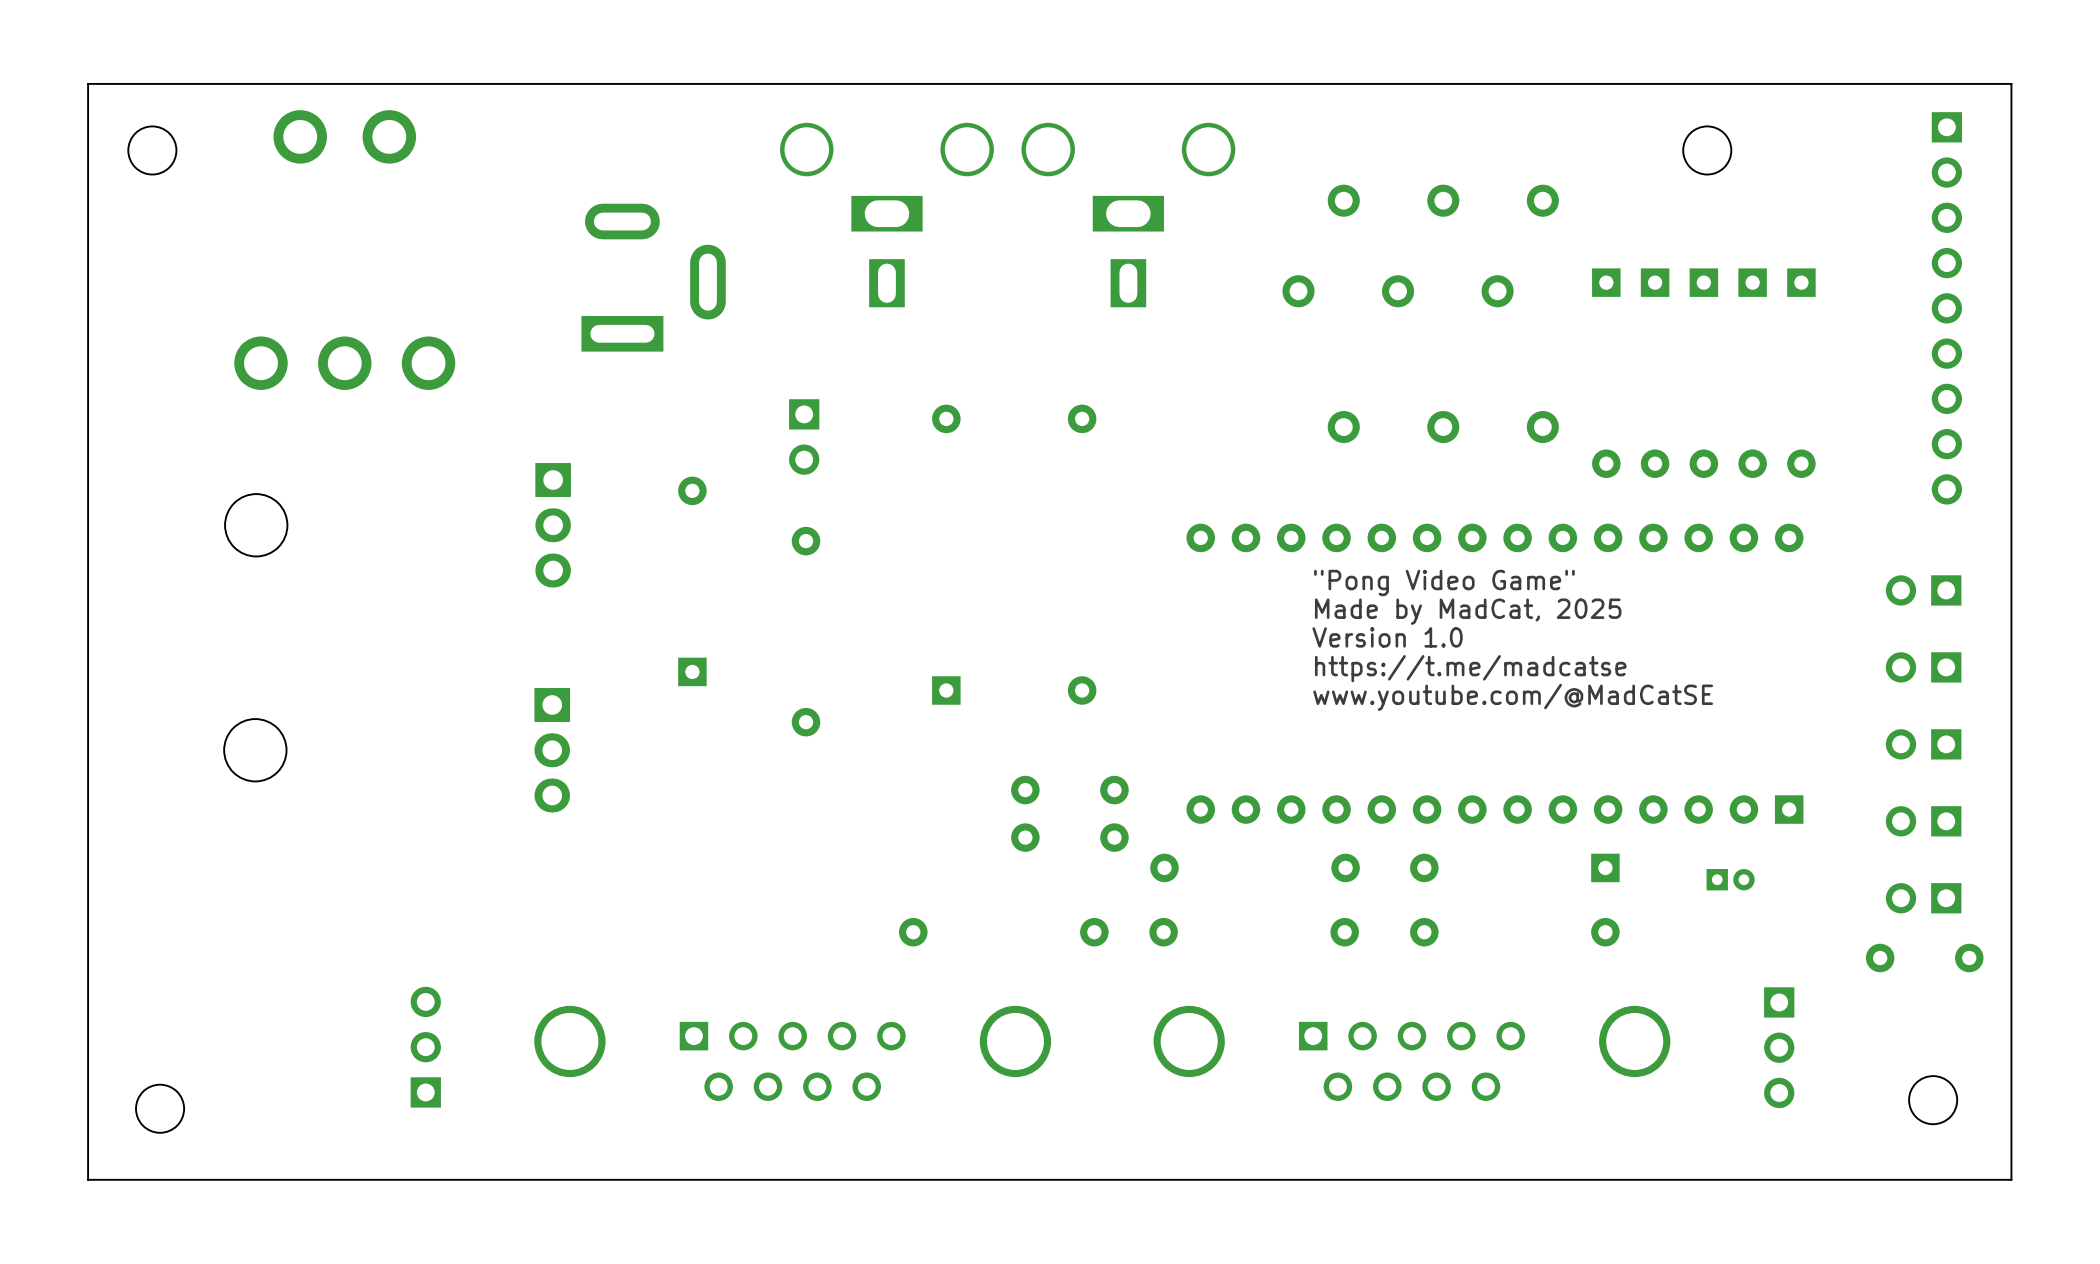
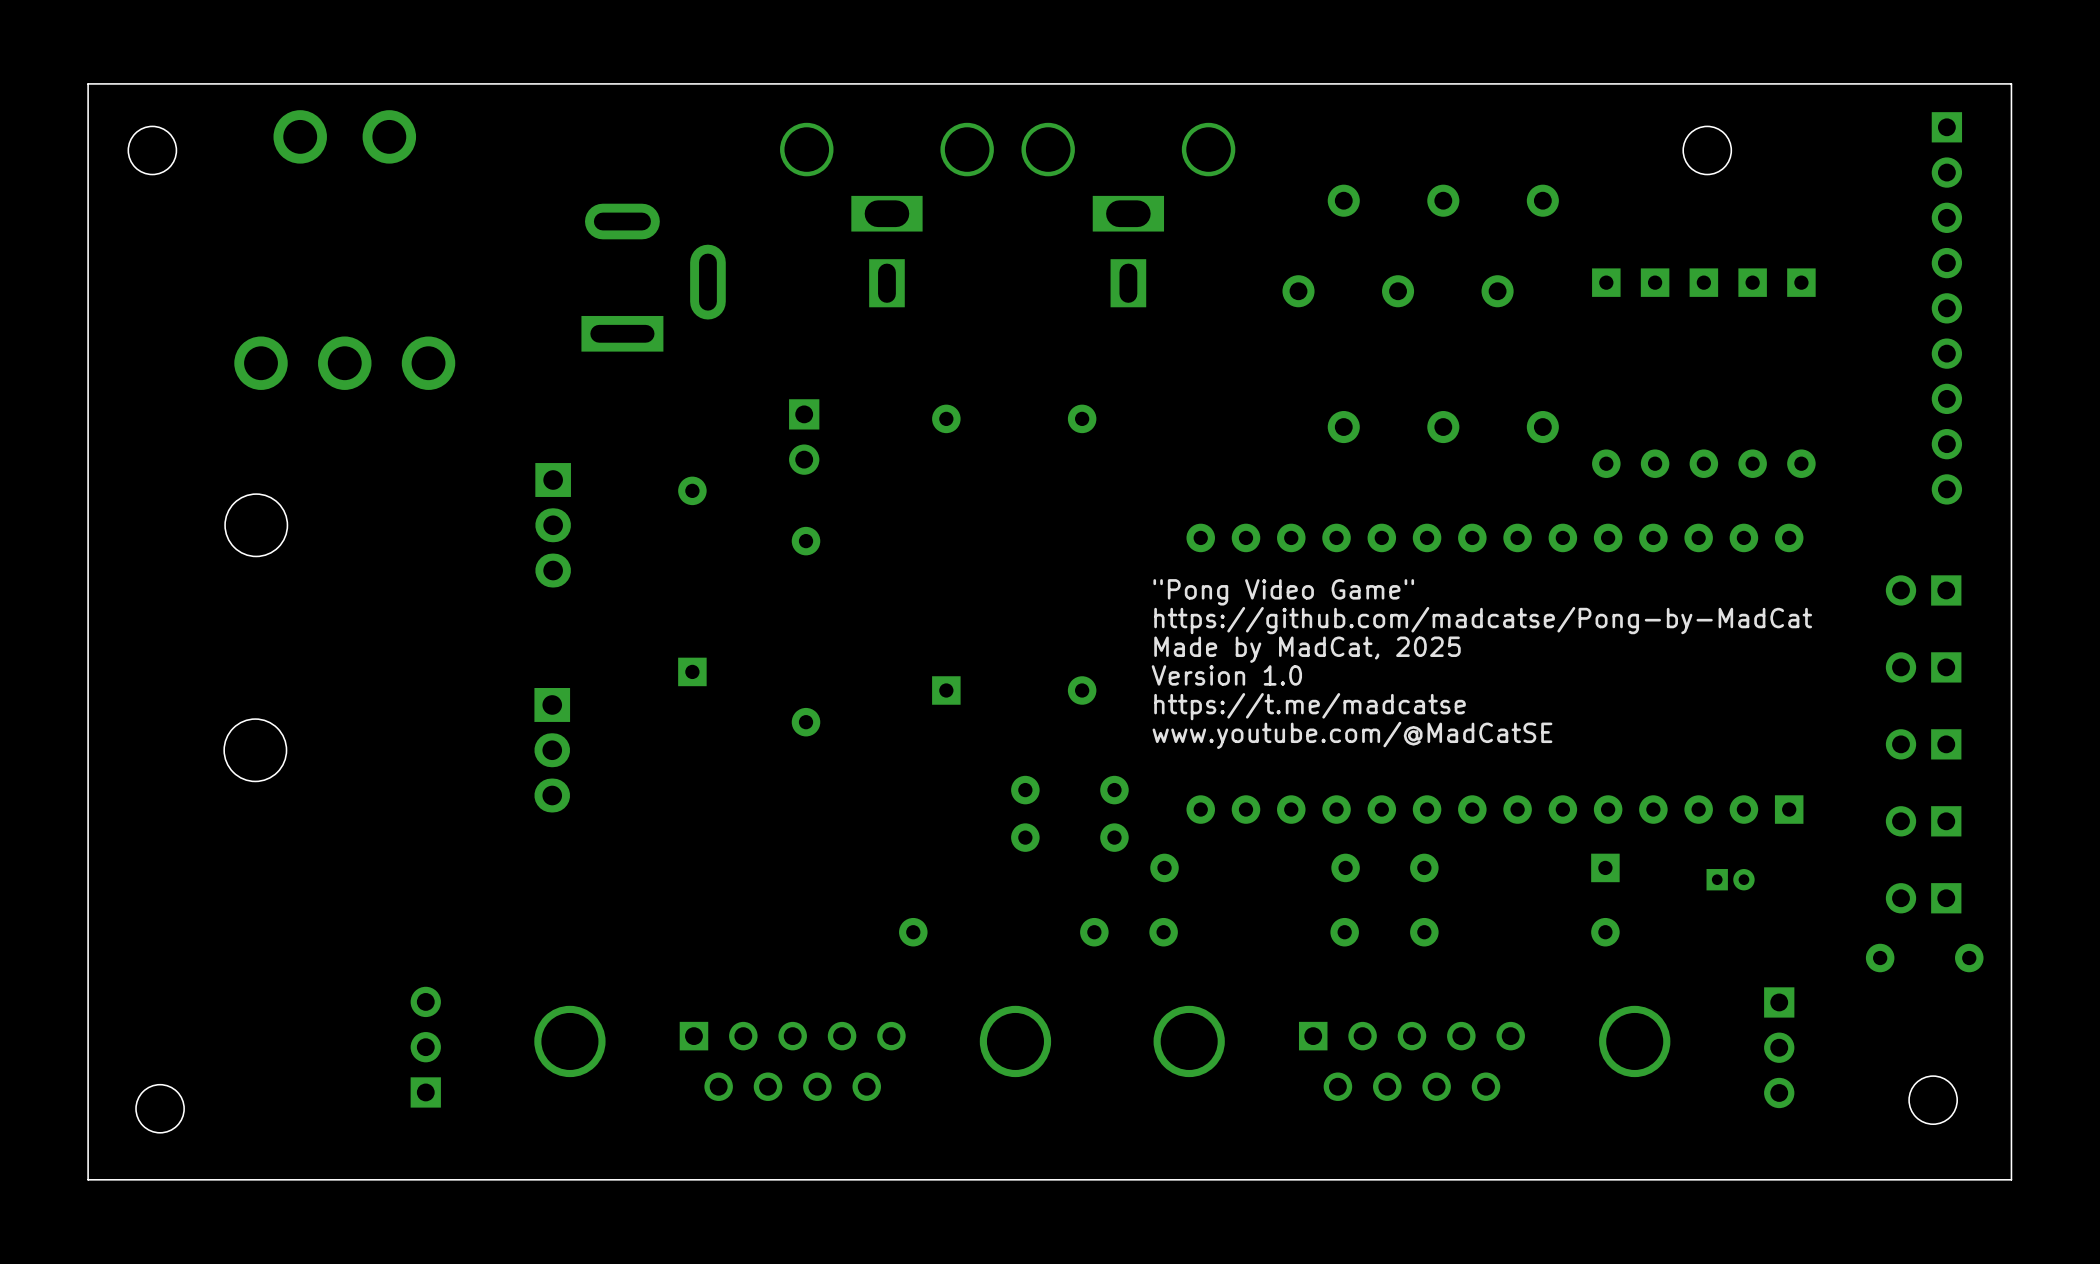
text position: "Pong Video Game" (1444, 582) -> "Pong Video Game" (1283, 592)
text position: Made by MadCat, 2025 (1468, 611) -> Made by MadCat, 2025 (1307, 649)
text: none -> https://github.com/madcatse/Pong-by-MadCat (1483, 620)
text position: Version 1.0 (1387, 637) -> Version 1.0 (1226, 675)
text position: https://t.me/madcatse (1470, 668) -> https://t.me/madcatse (1310, 706)
text position: www.youtube.com/@MadCatSE (1513, 697) -> www.youtube.com/@MadCatSE (1352, 735)

